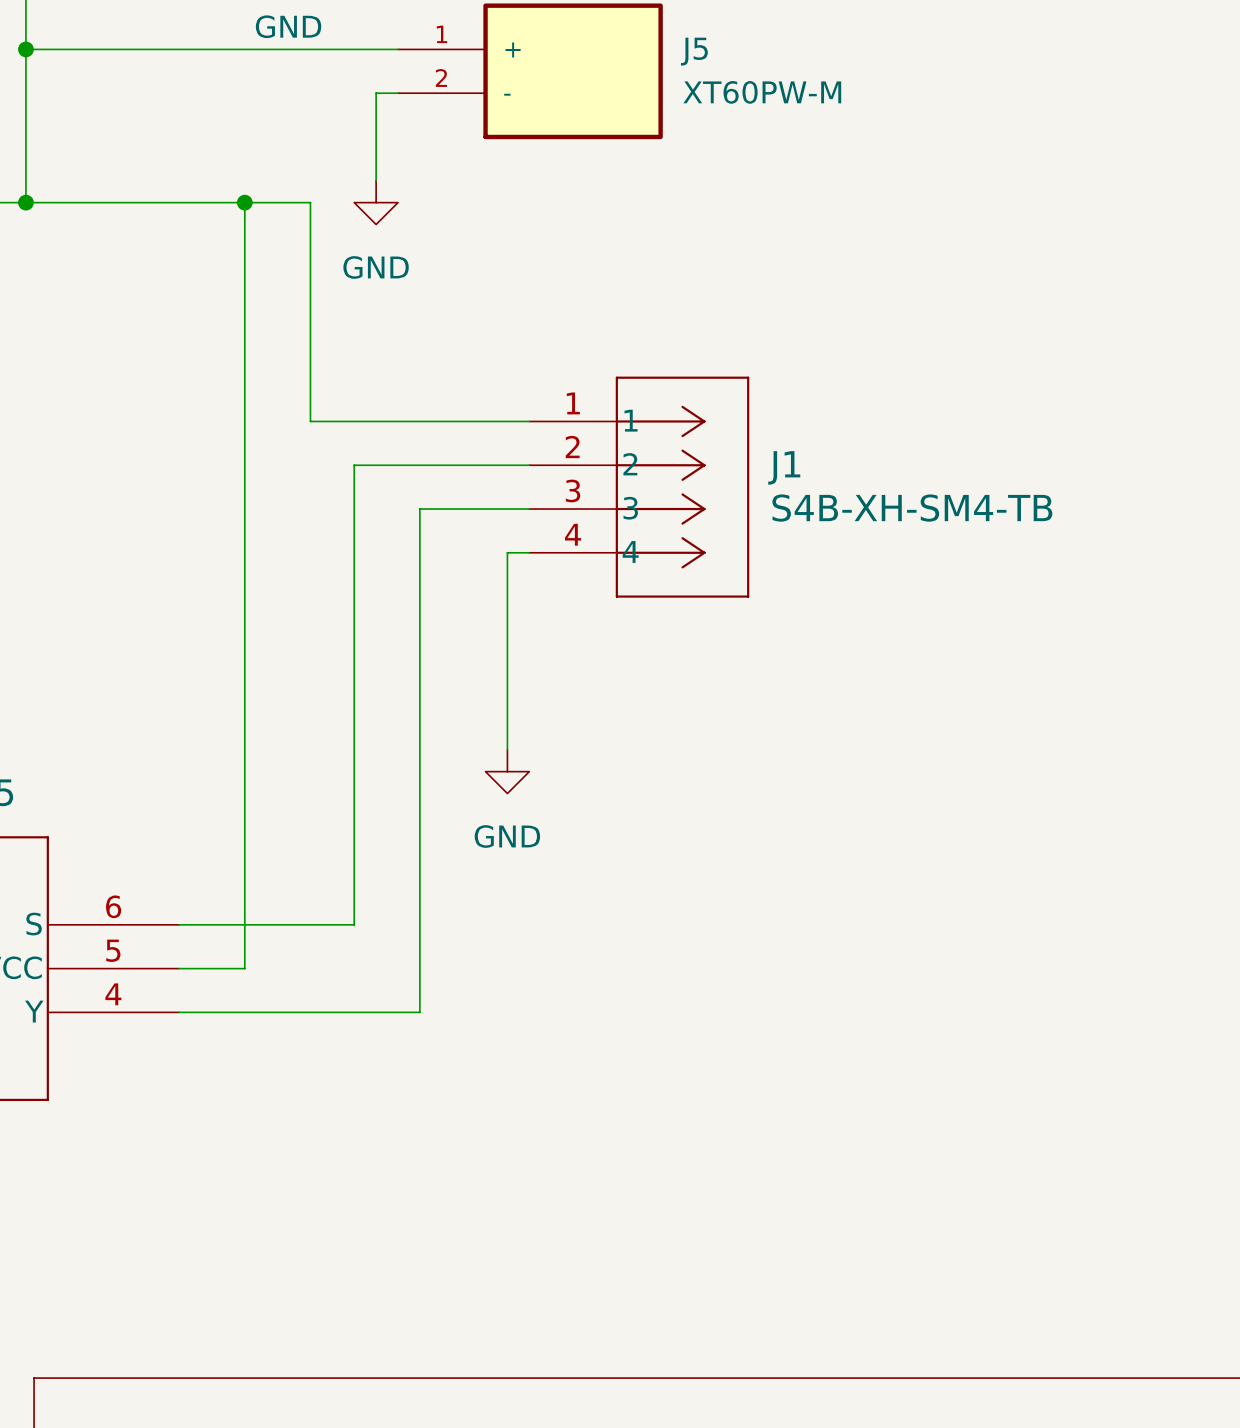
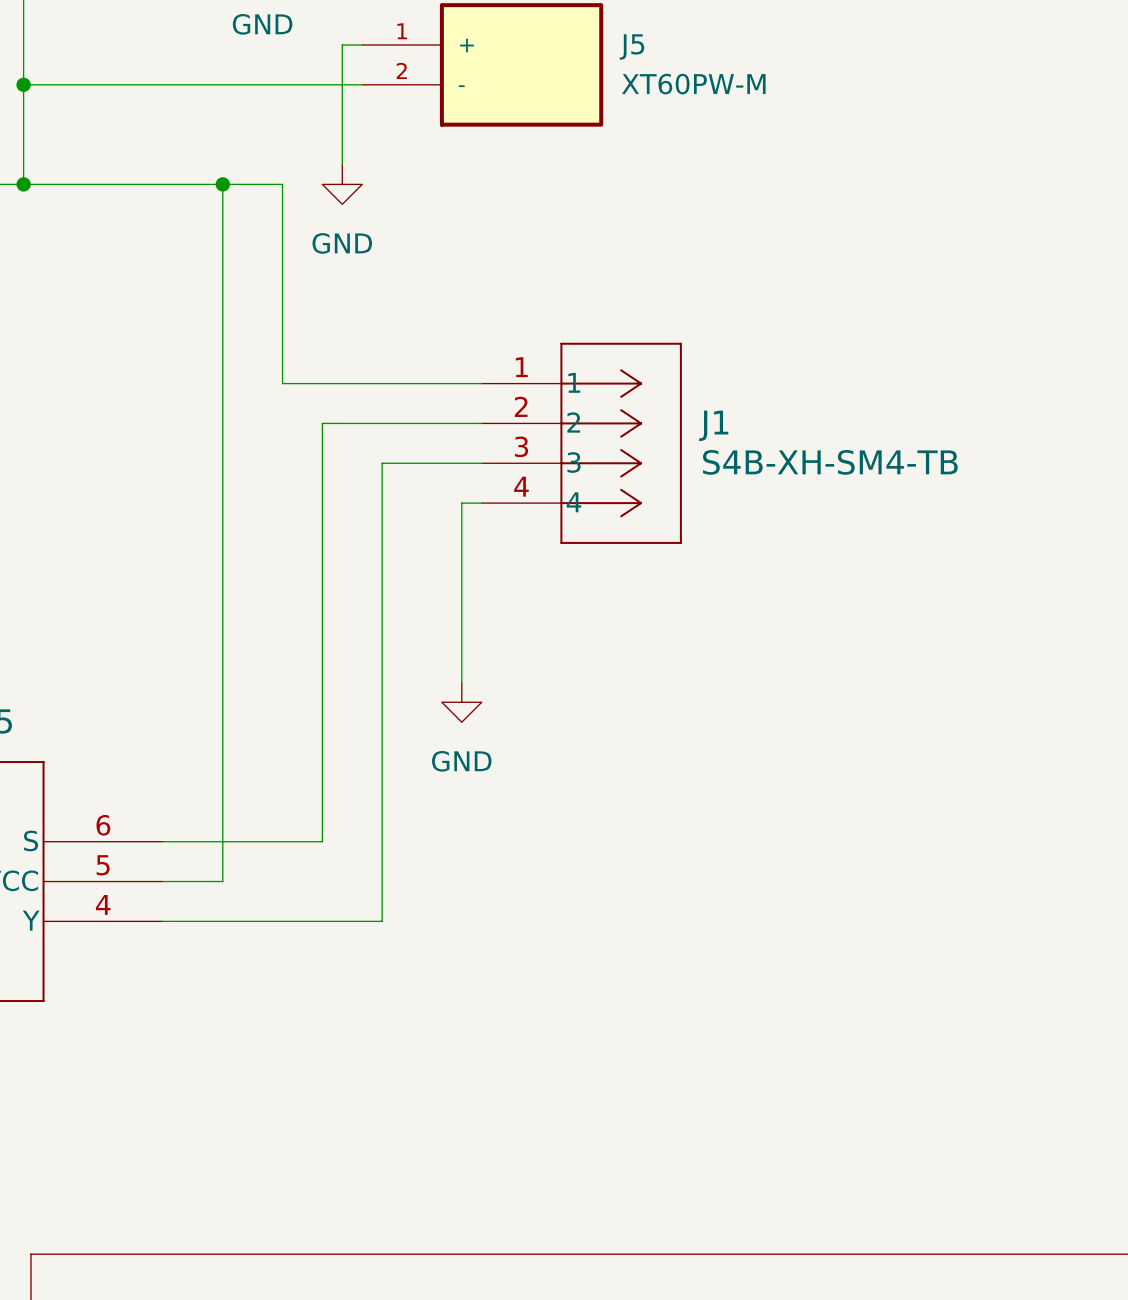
wire: (25, 49) (376, 49) -> (23, 84) (342, 84) (342, 44)
junction position: (25, 49) -> (23, 84)

